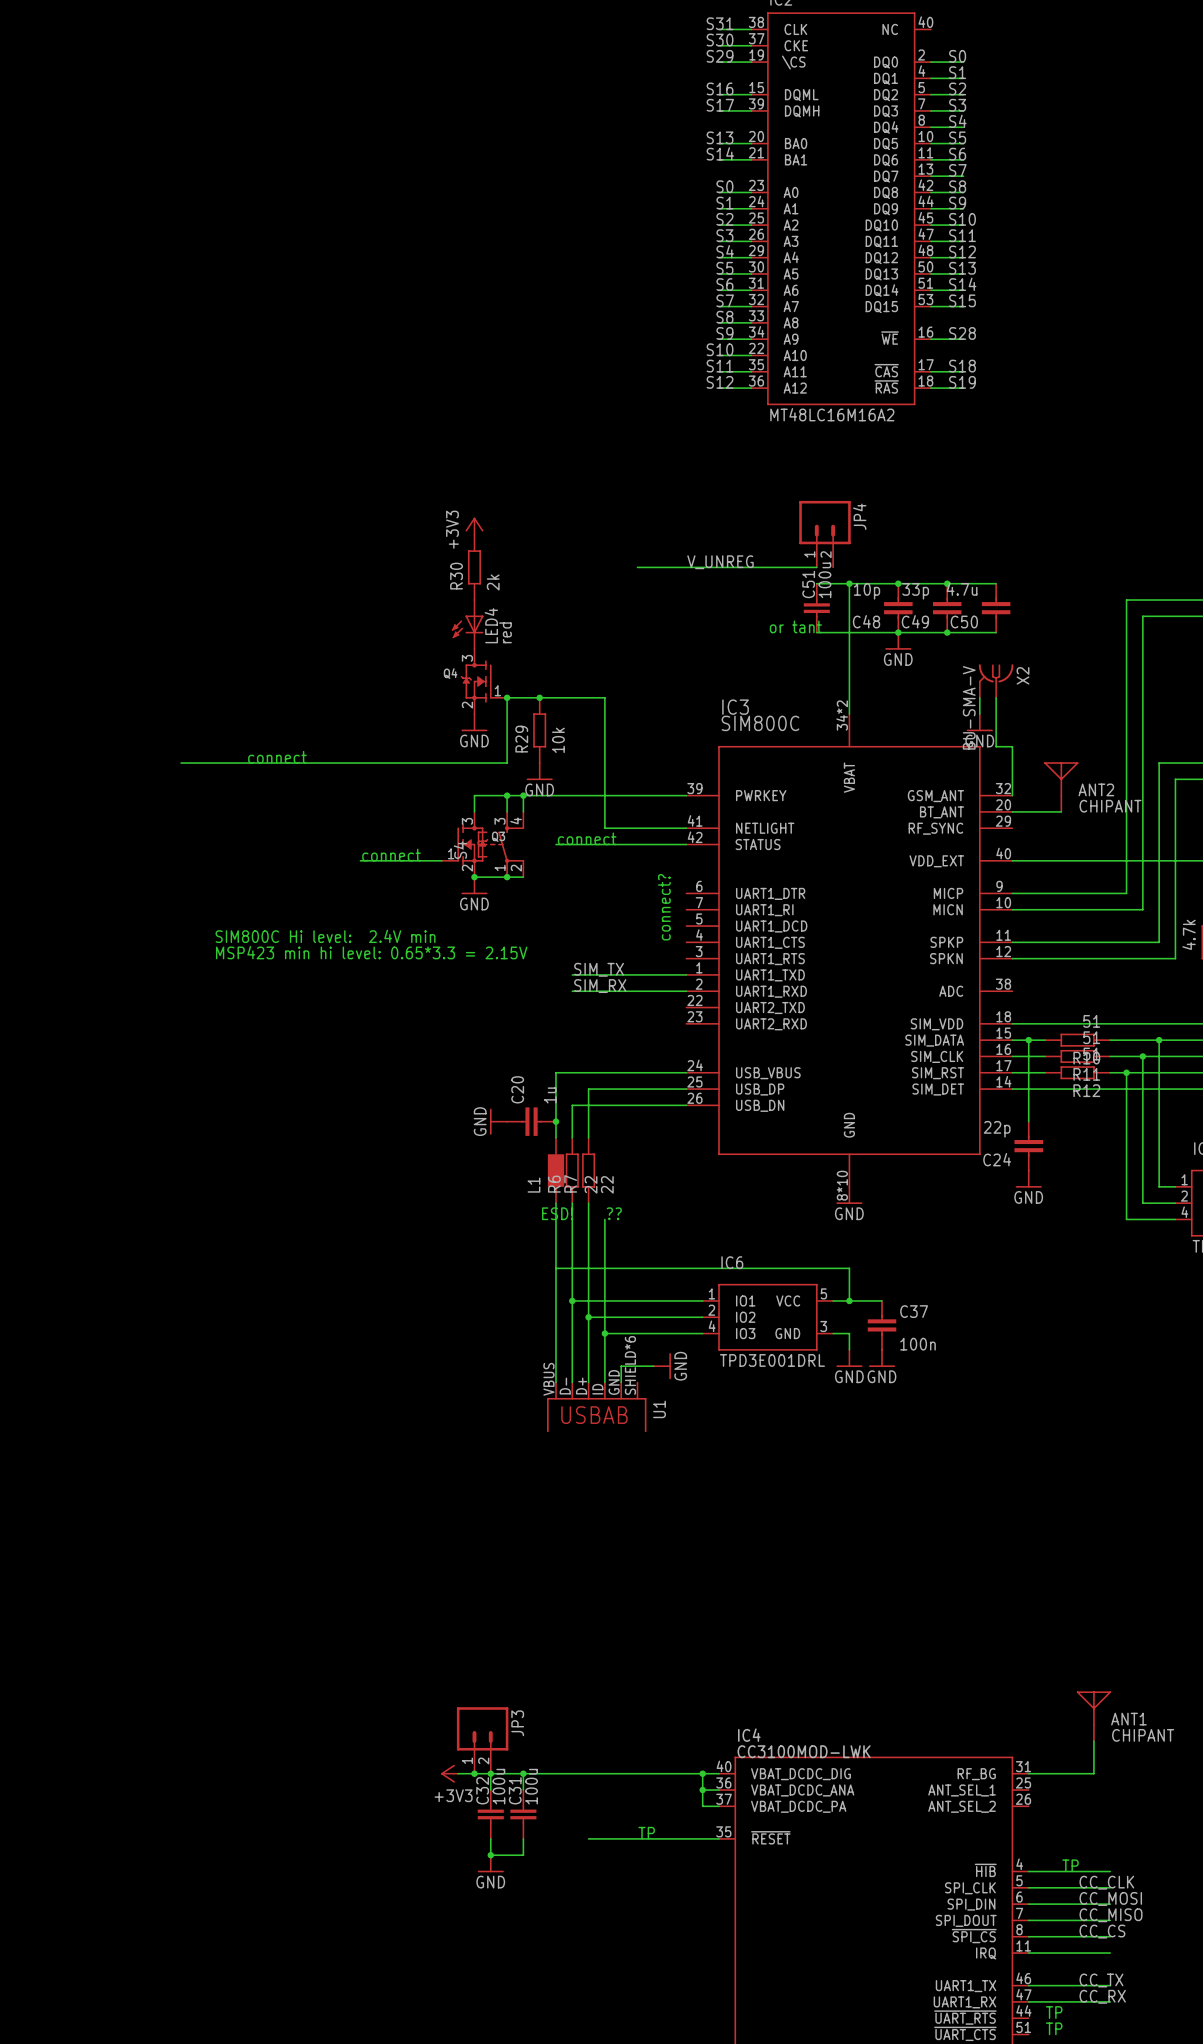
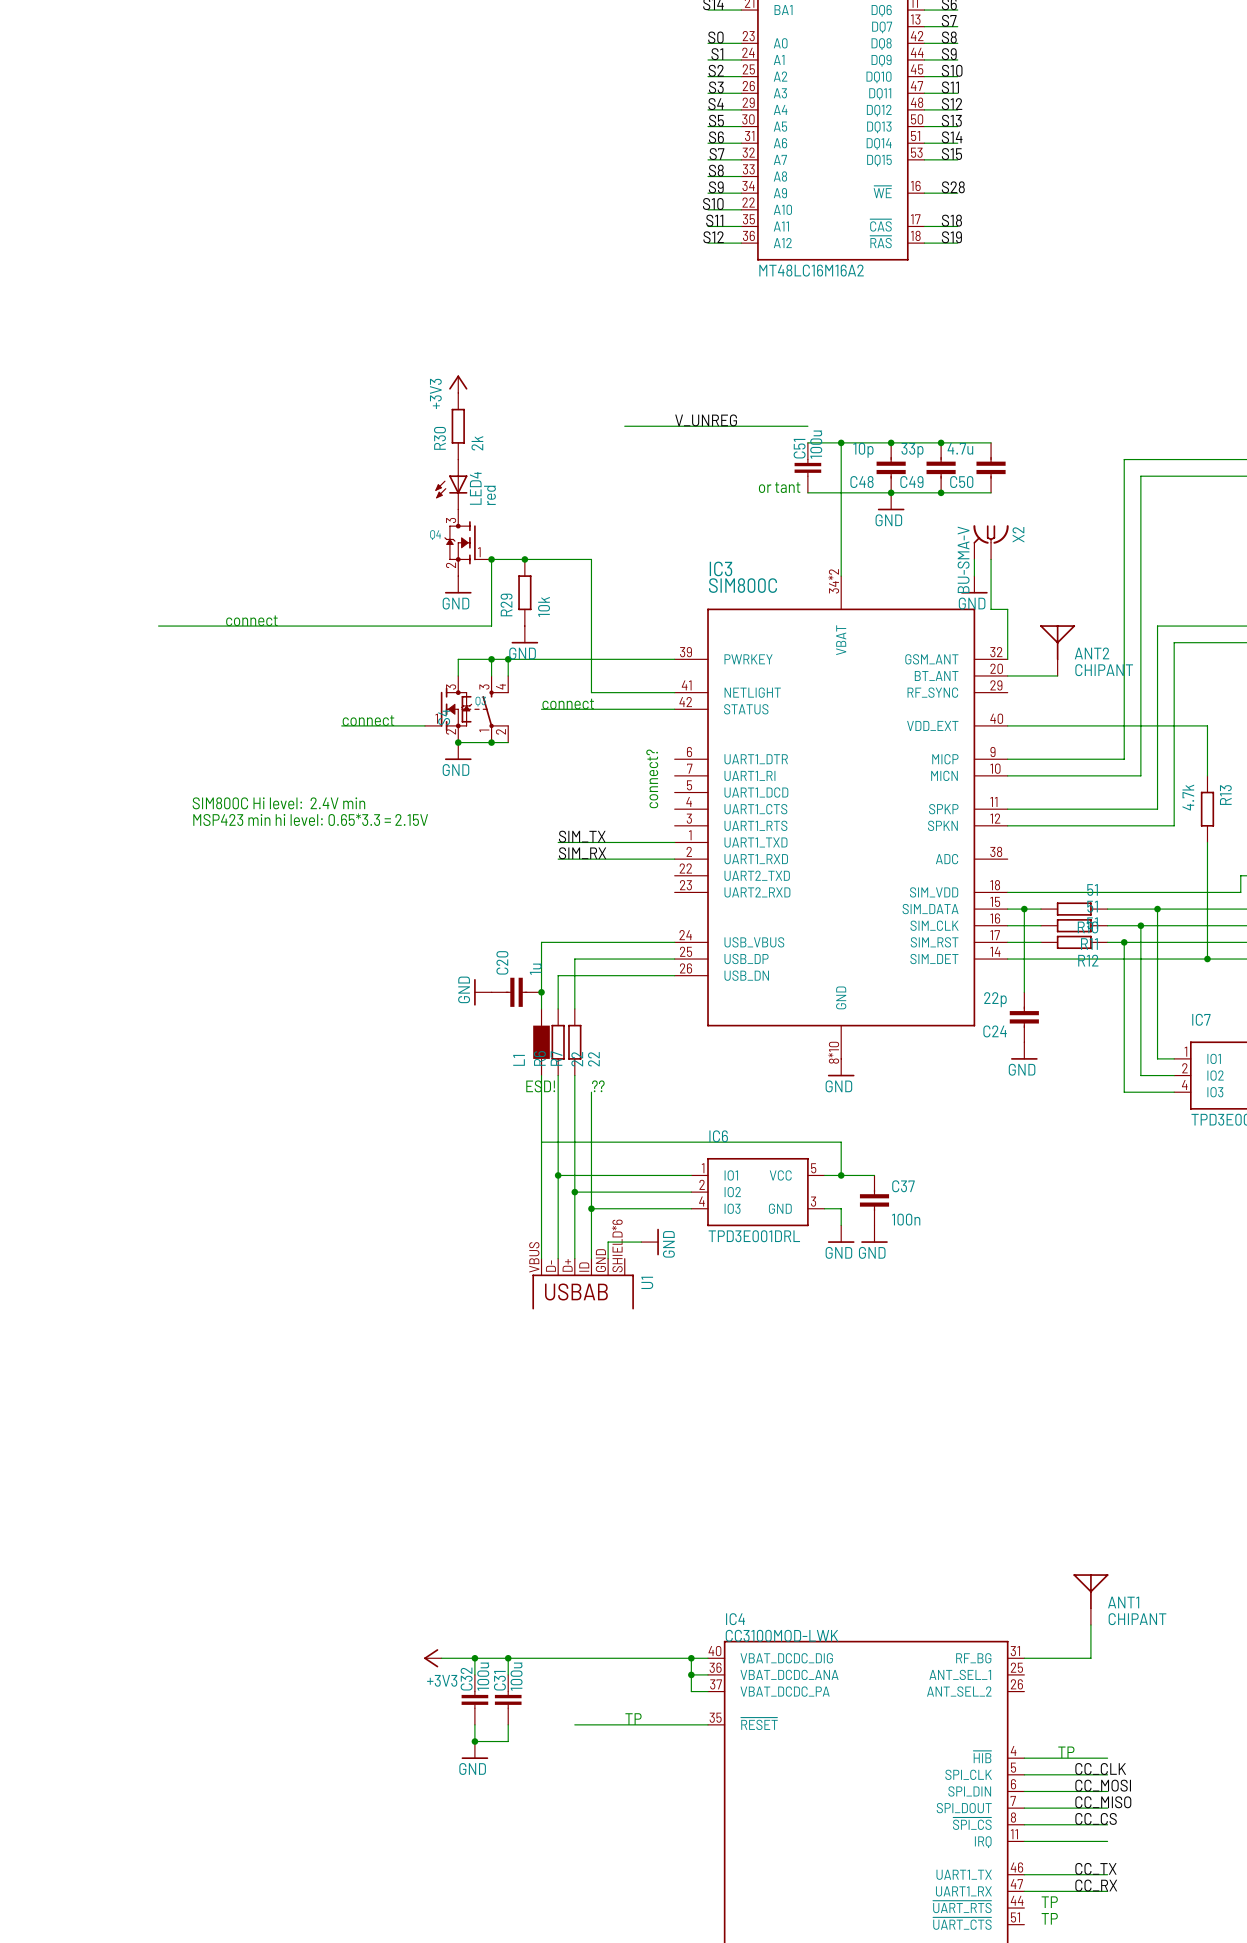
JP4: (824, 534) -> none
JP3: (482, 1740) -> none
junction: (474, 1773) -> none

